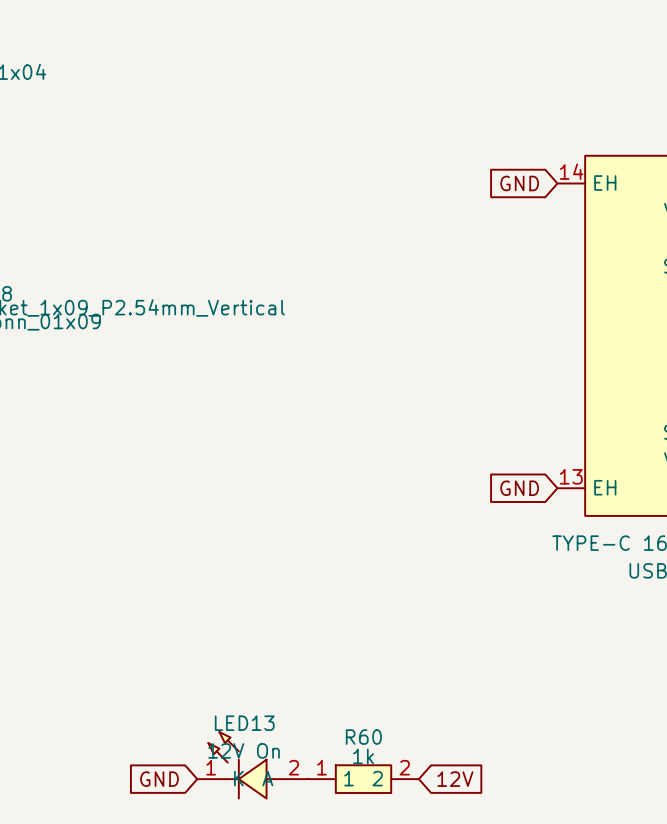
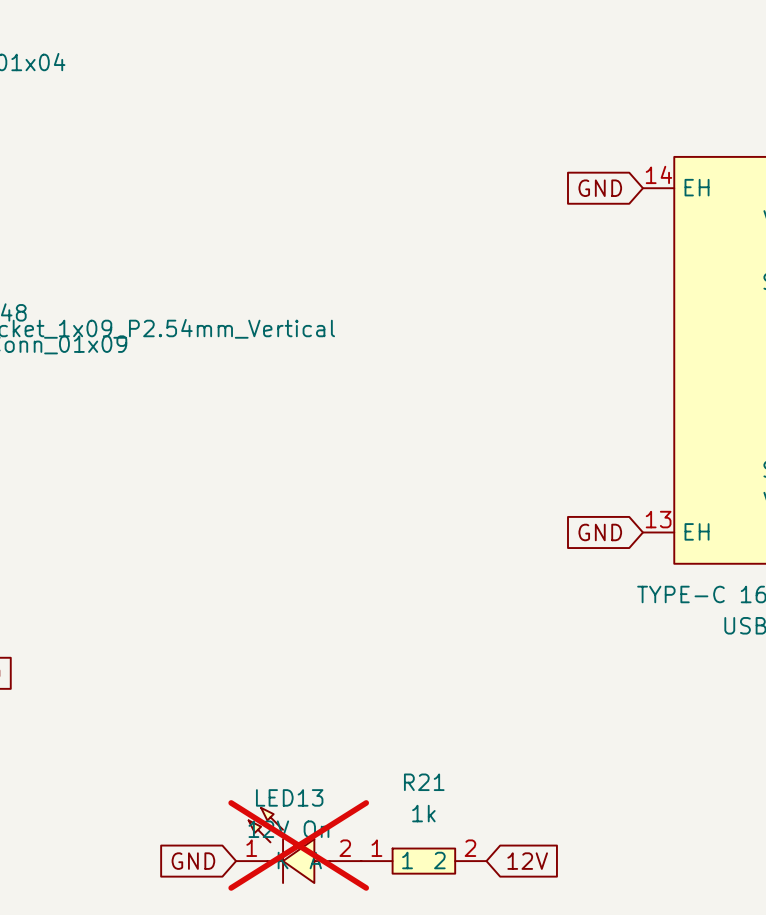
LED13 do-not-place cross: none -> (298, 845)
R60: 1k (363, 779) -> none
R21: none -> 1k (423, 861)

